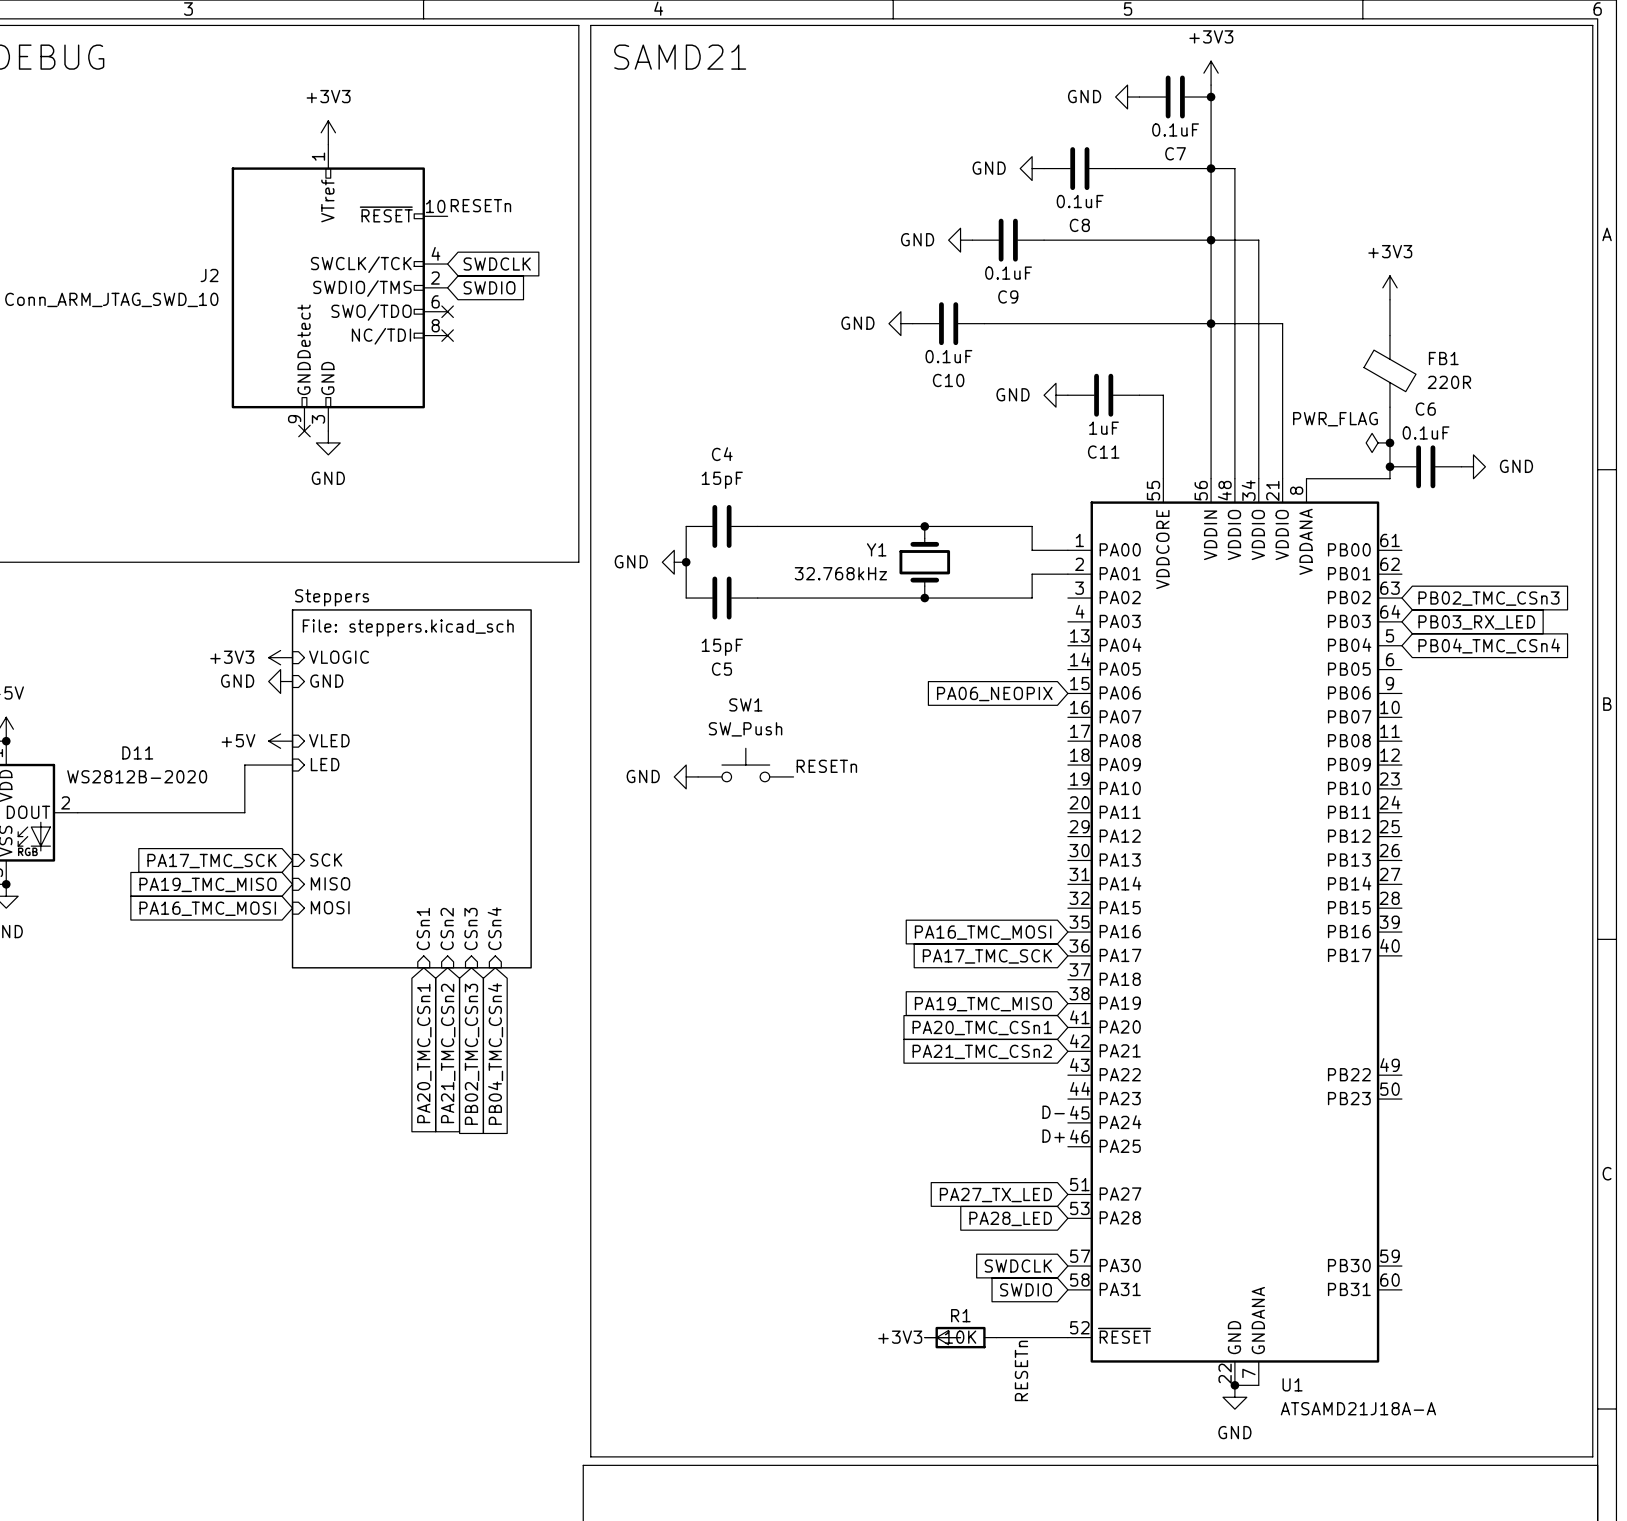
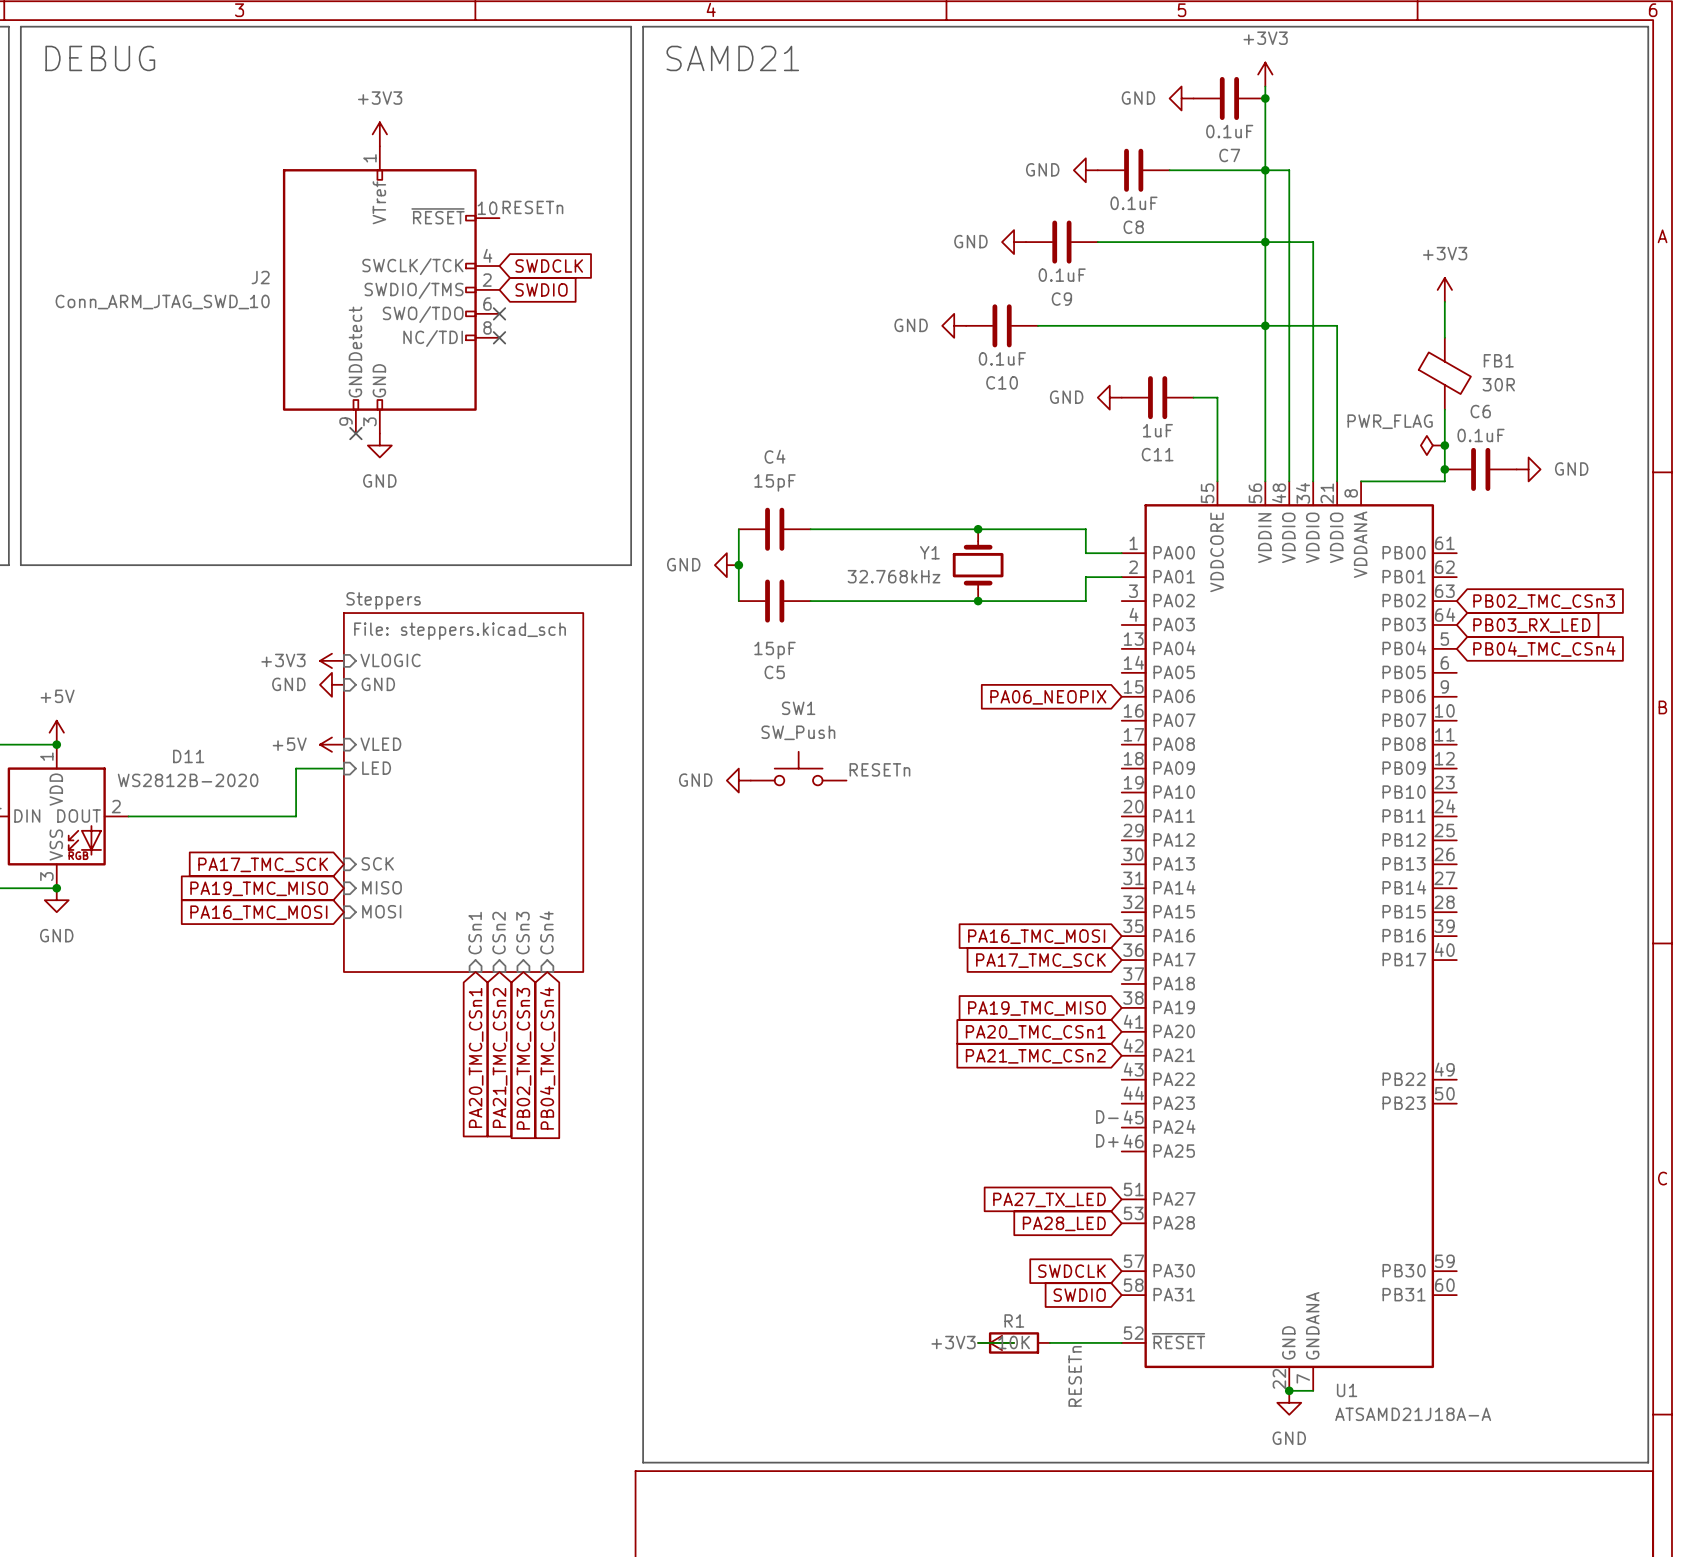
FB1 value: 220R (1449, 382) -> 30R (1498, 384)

